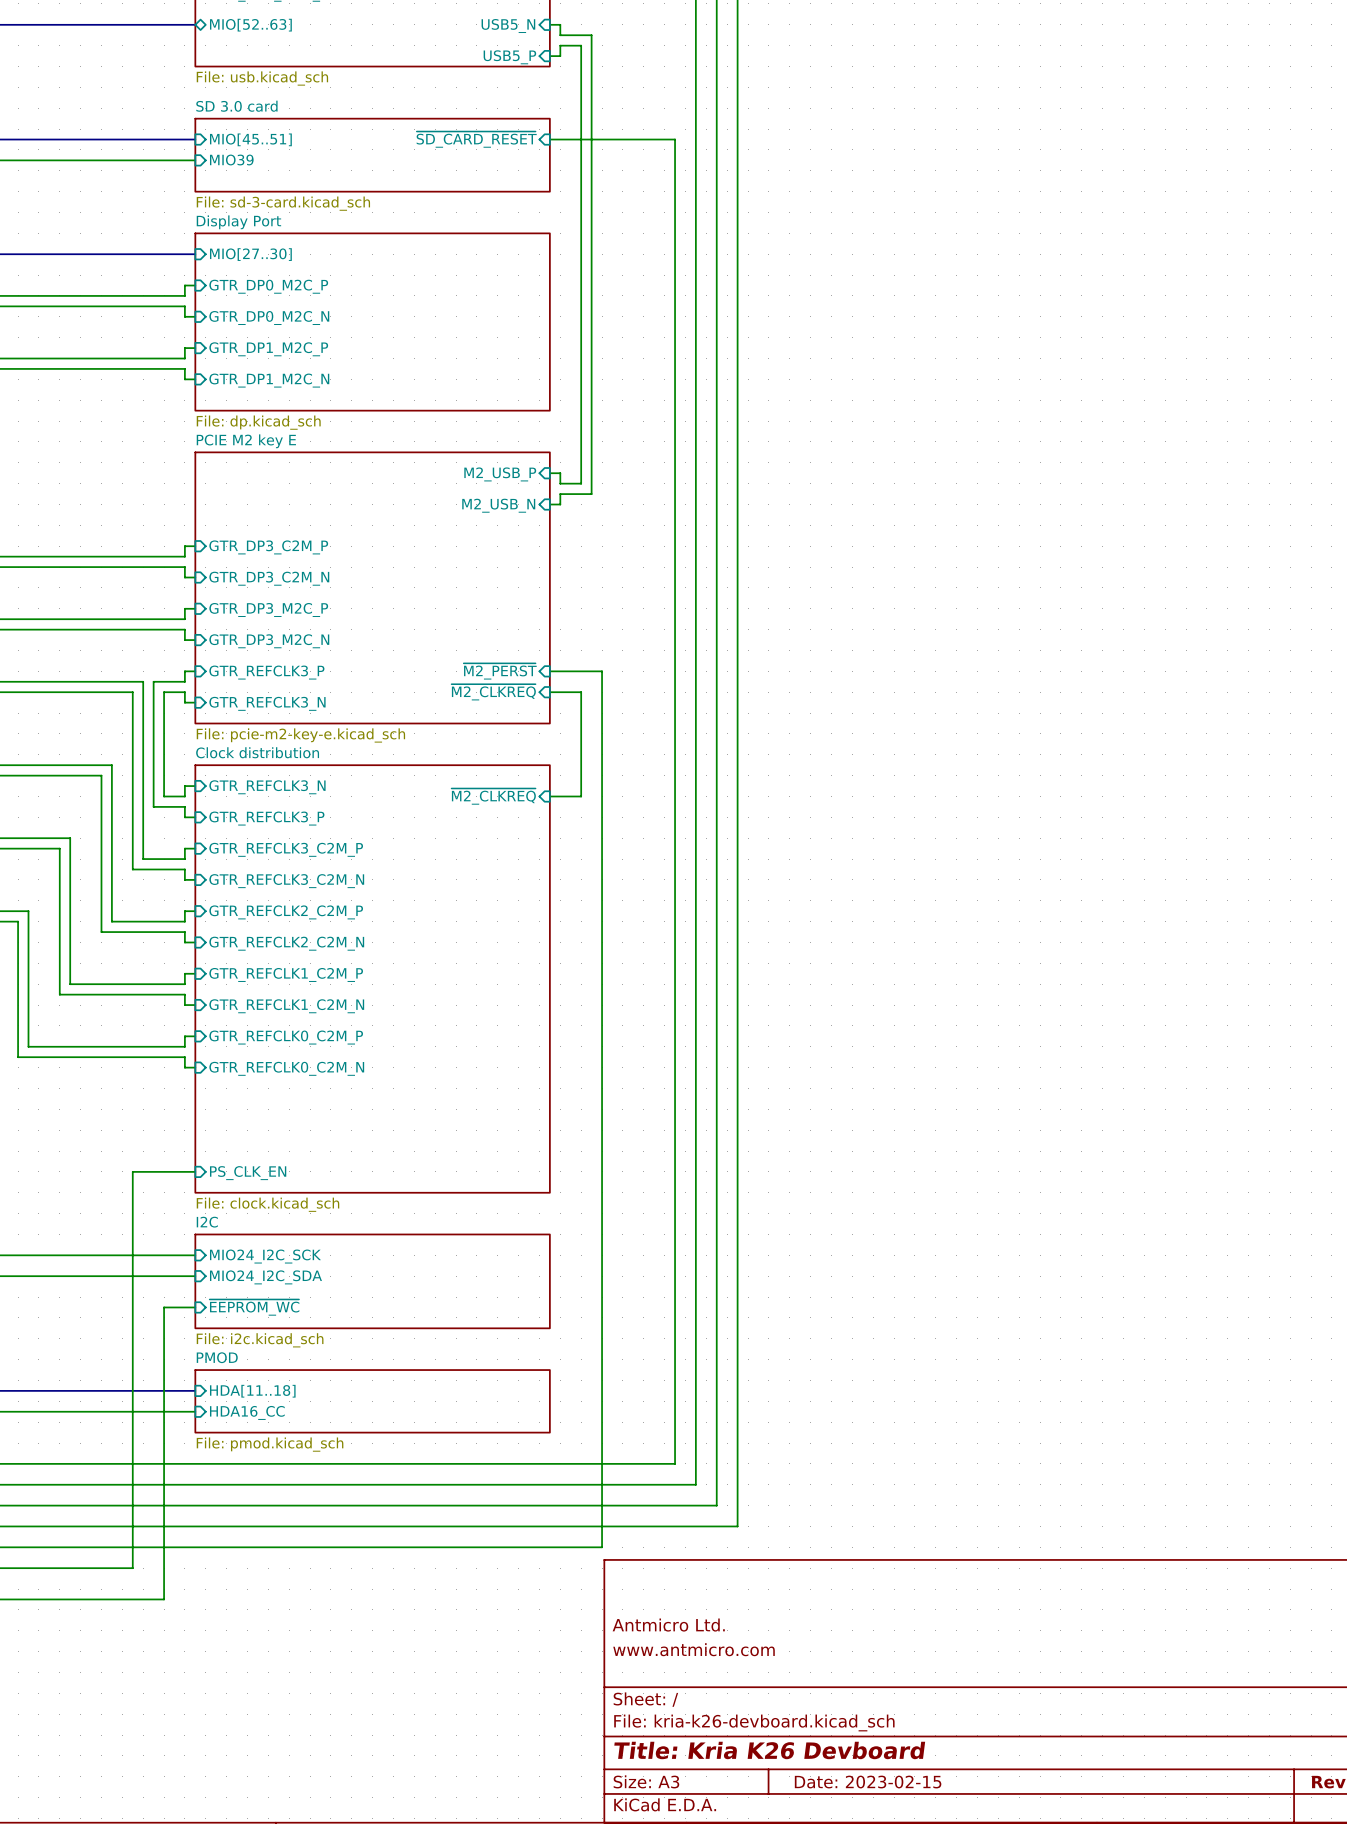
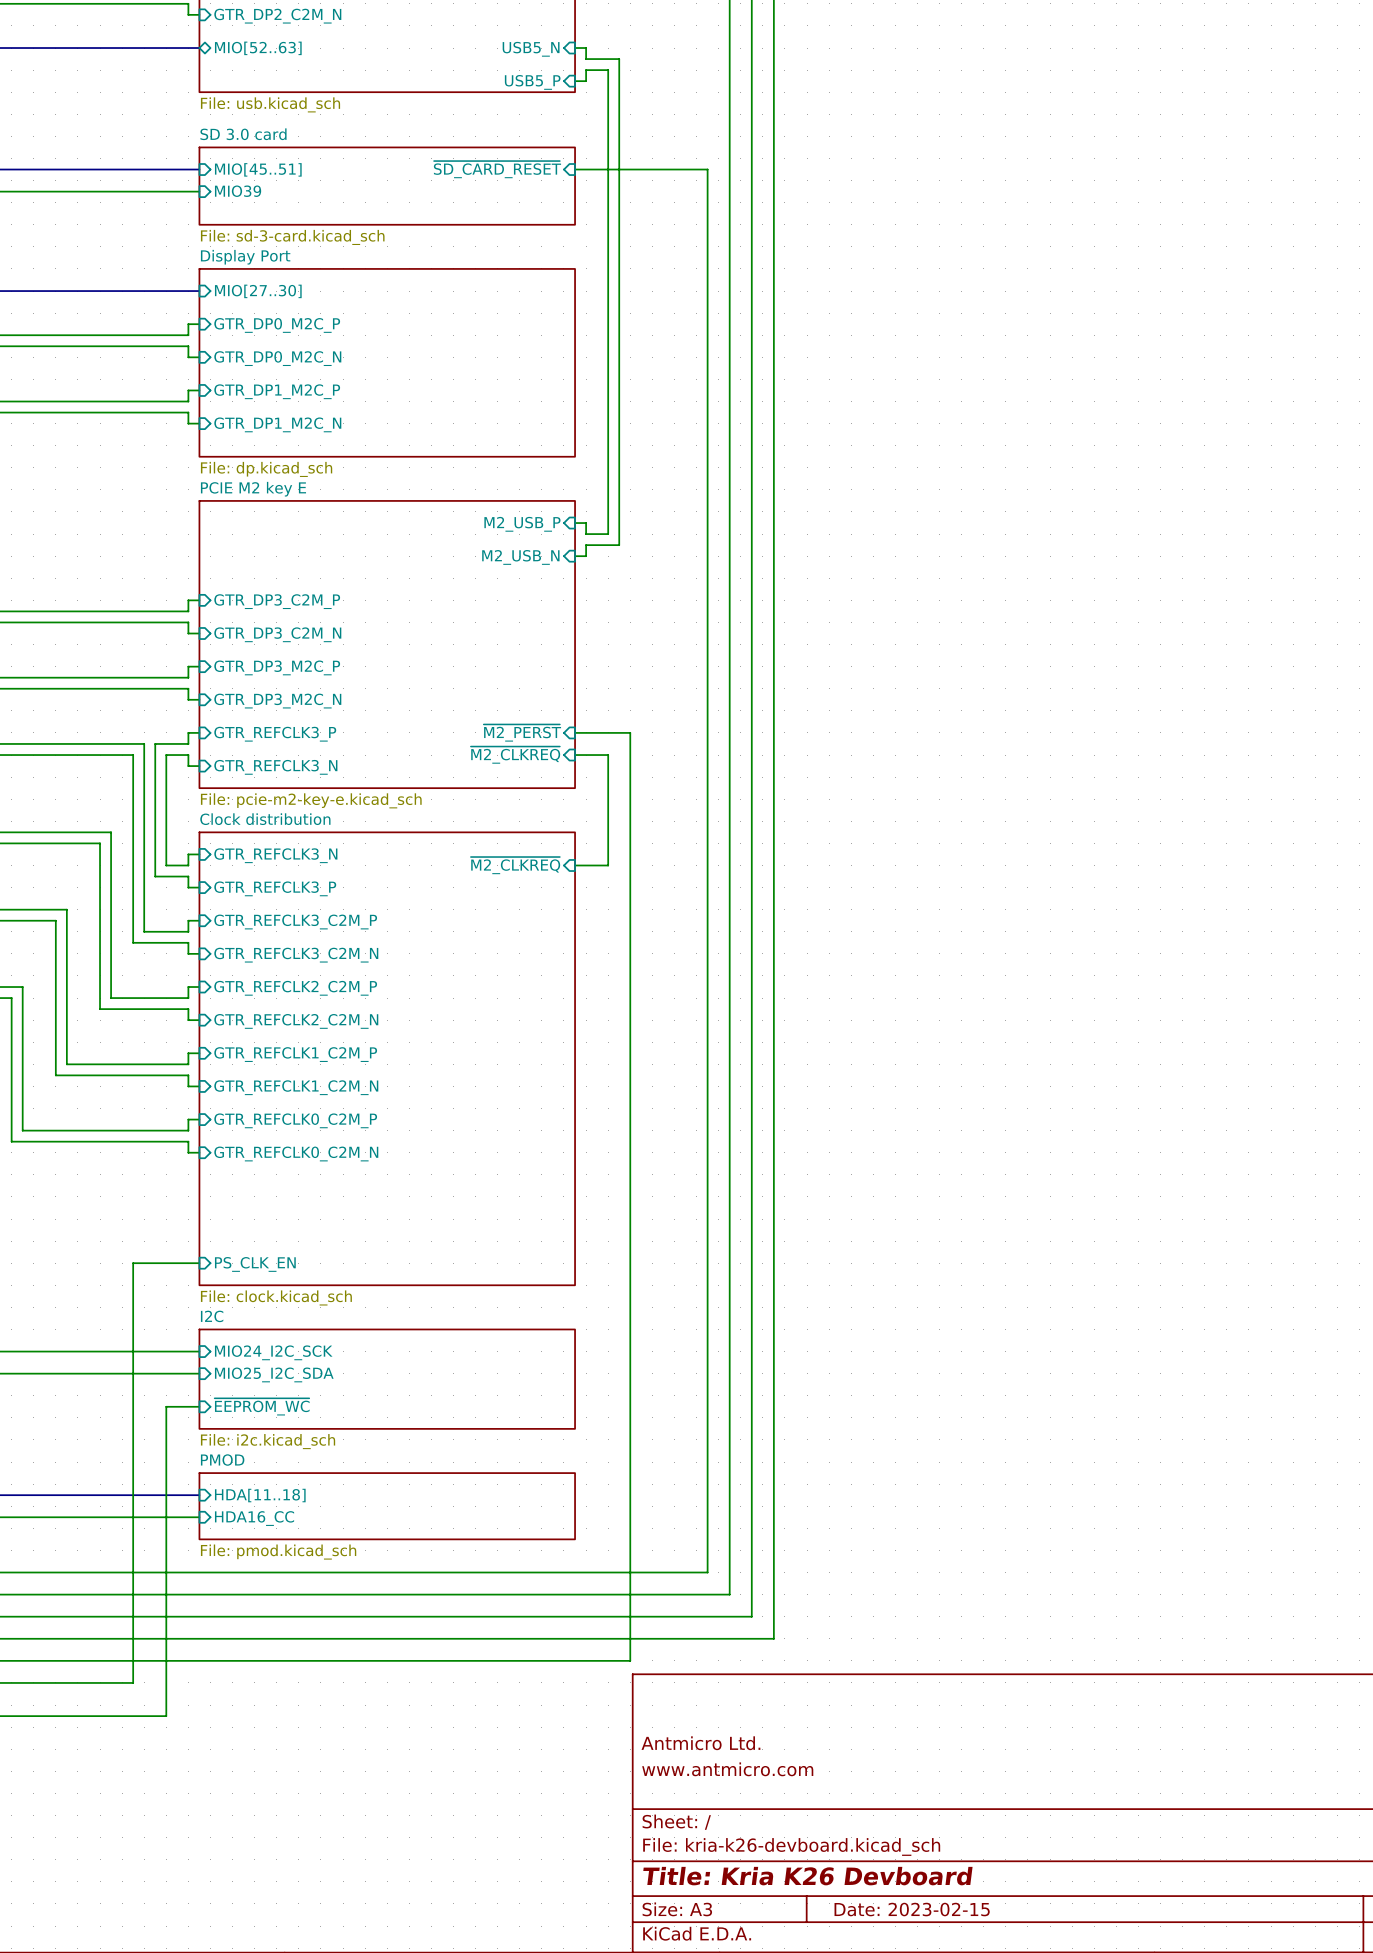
sheet pin: MIO24_I2C_SDA (265, 1277) -> MIO25_I2C_SDA (274, 1374)

